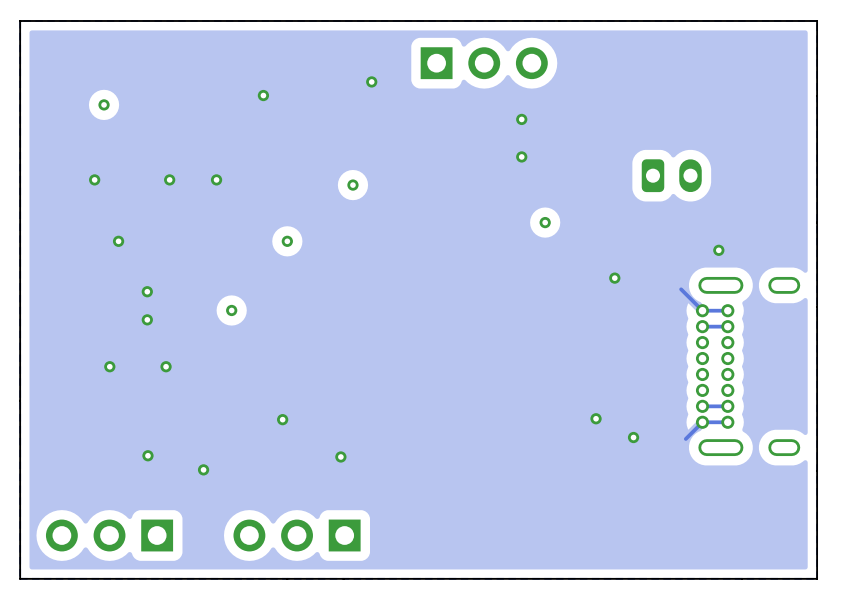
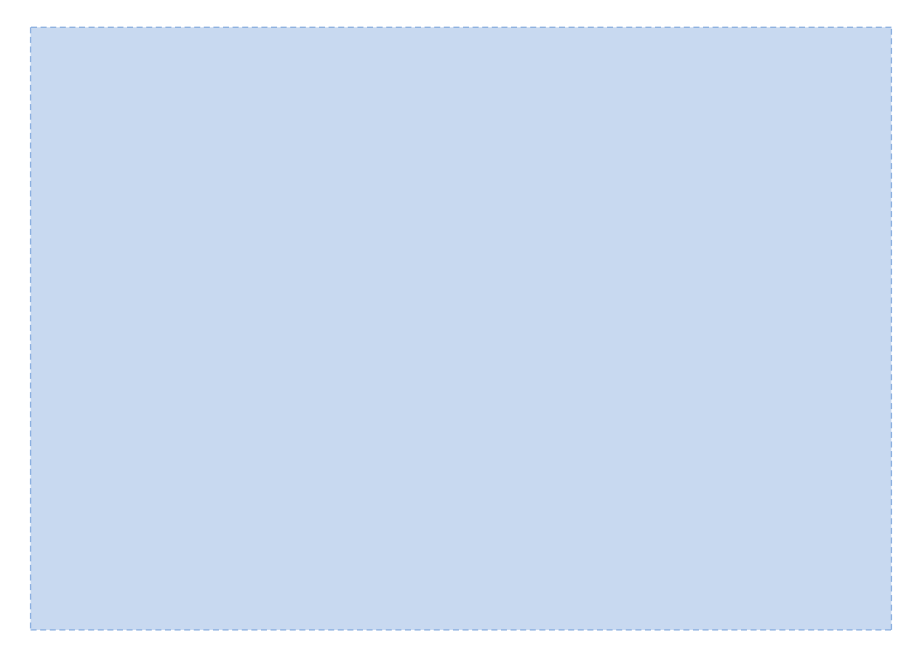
board edge: (817, 20) (817, 578) (20, 578) (20, 20) (817, 20) -> none
part: (484, 63) -> none
via: (371, 81) -> none
via: (263, 95) -> none
via: (104, 104) -> none
via: (521, 119) -> none
via: (521, 156) -> none
part: (671, 175) -> none
via: (94, 179) -> none
via: (169, 179) -> none
via: (216, 179) -> none
via: (352, 185) -> none
via: (545, 222) -> none
via: (118, 241) -> none
via: (287, 241) -> none
via: (718, 250) -> none
via: (614, 278) -> none
track: (681, 289) (702, 310) (727, 310) -> none
via: (147, 291) -> none
via: (231, 310) -> none
via: (147, 319) -> none
track: (727, 326) (702, 326) -> none
via: (109, 366) -> none
via: (166, 366) -> none
part: (748, 366) -> none
track: (727, 406) (702, 406) -> none
via: (596, 418) -> none
via: (282, 419) -> none
track: (727, 422) (702, 422) (685, 438) -> none
via: (633, 437) -> none
via: (147, 455) -> none
via: (340, 456) -> none
via: (203, 469) -> none
part: (109, 535) -> none
part: (297, 535) -> none

